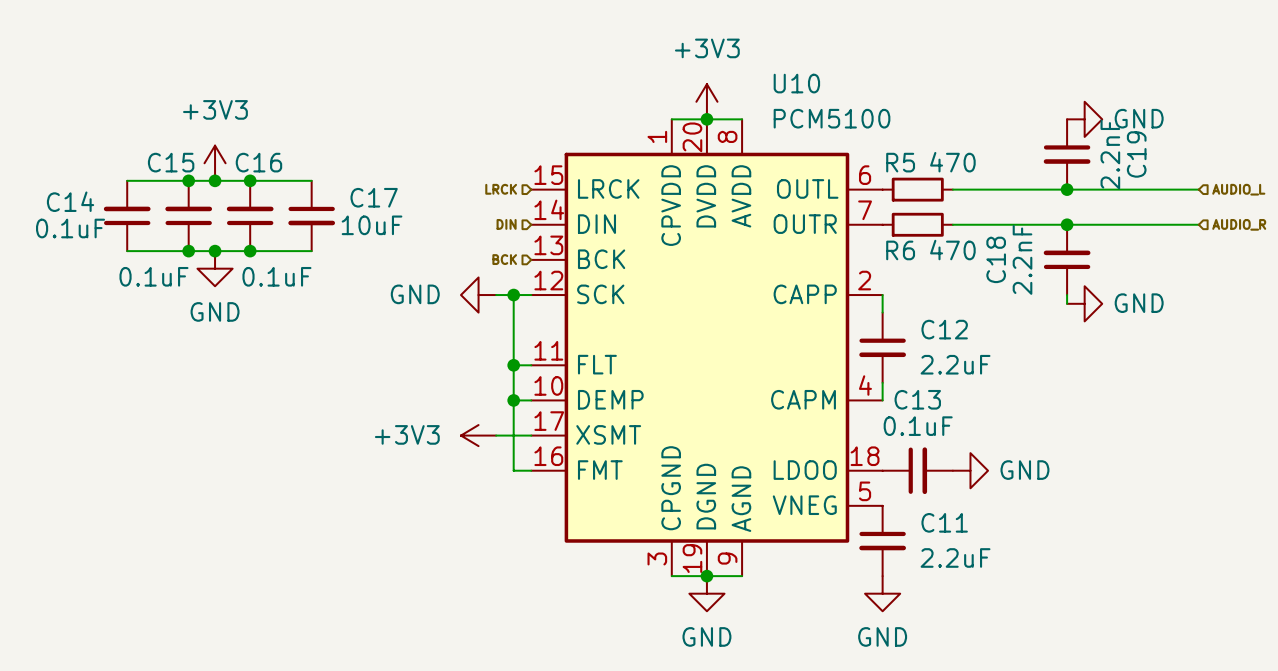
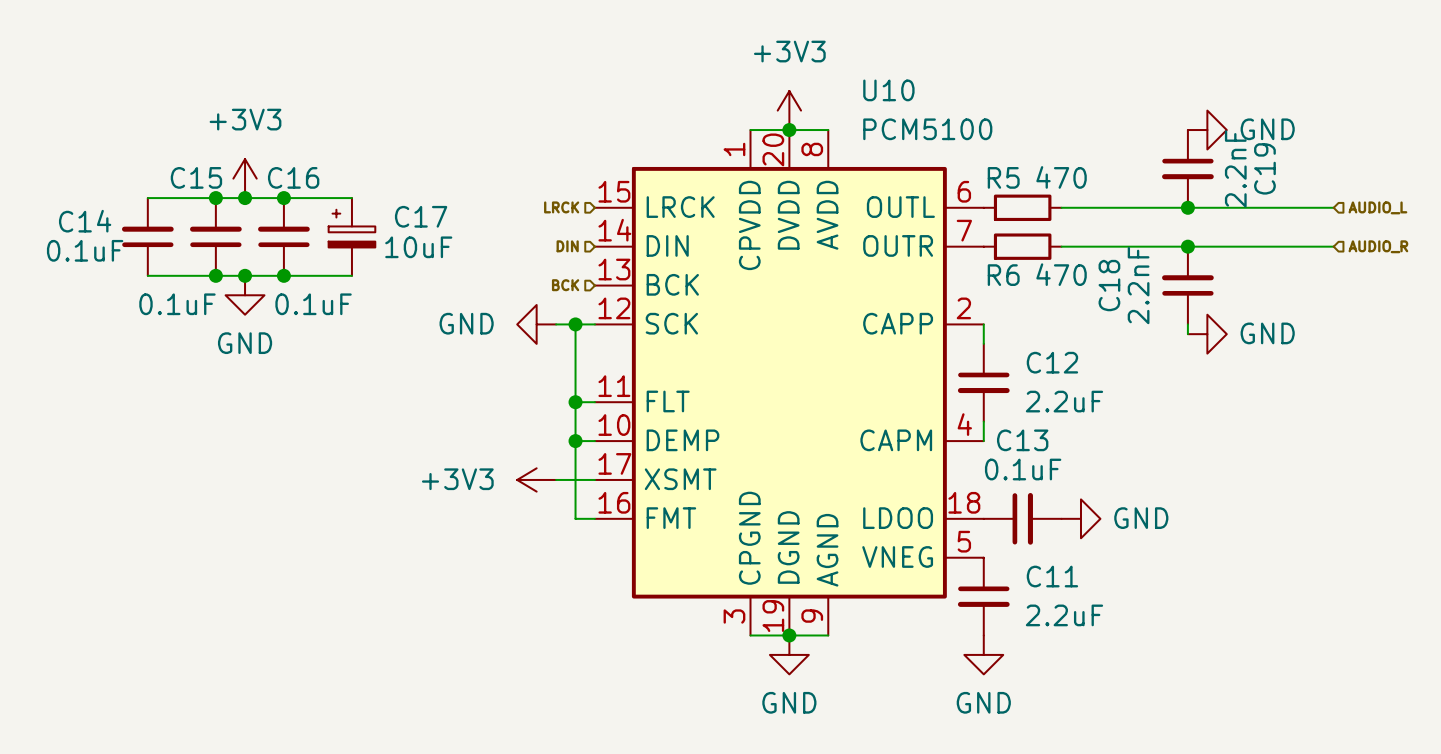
C17 symbol: [288, 180, 336, 252] -> [328, 198, 376, 276]

